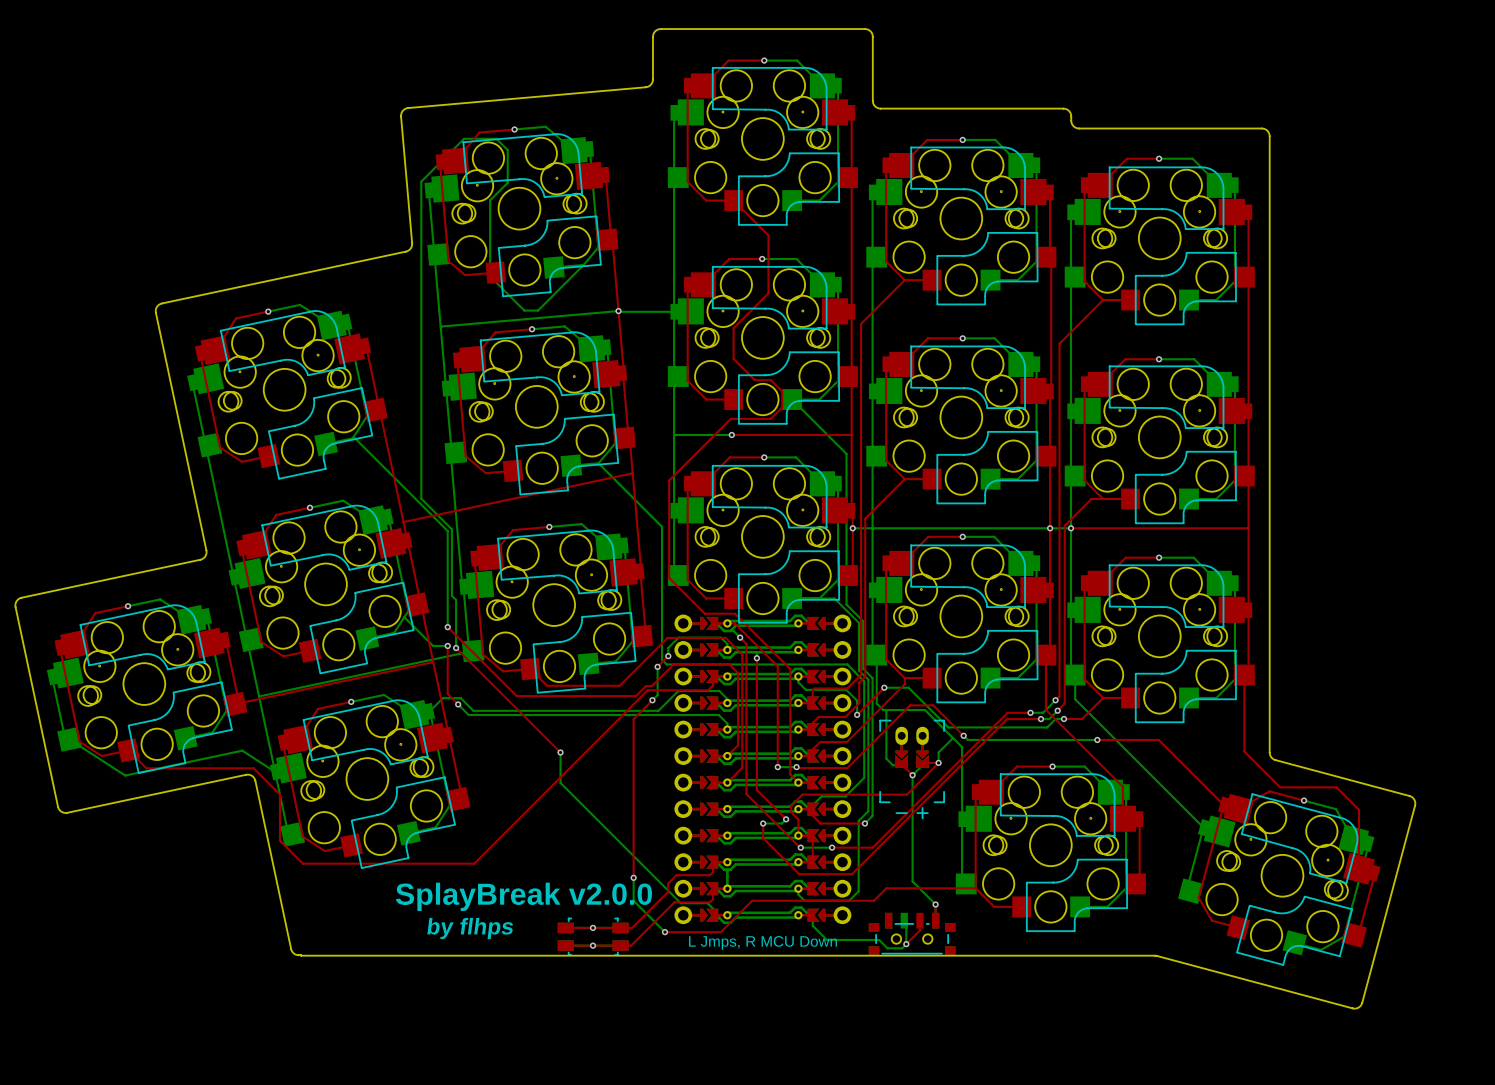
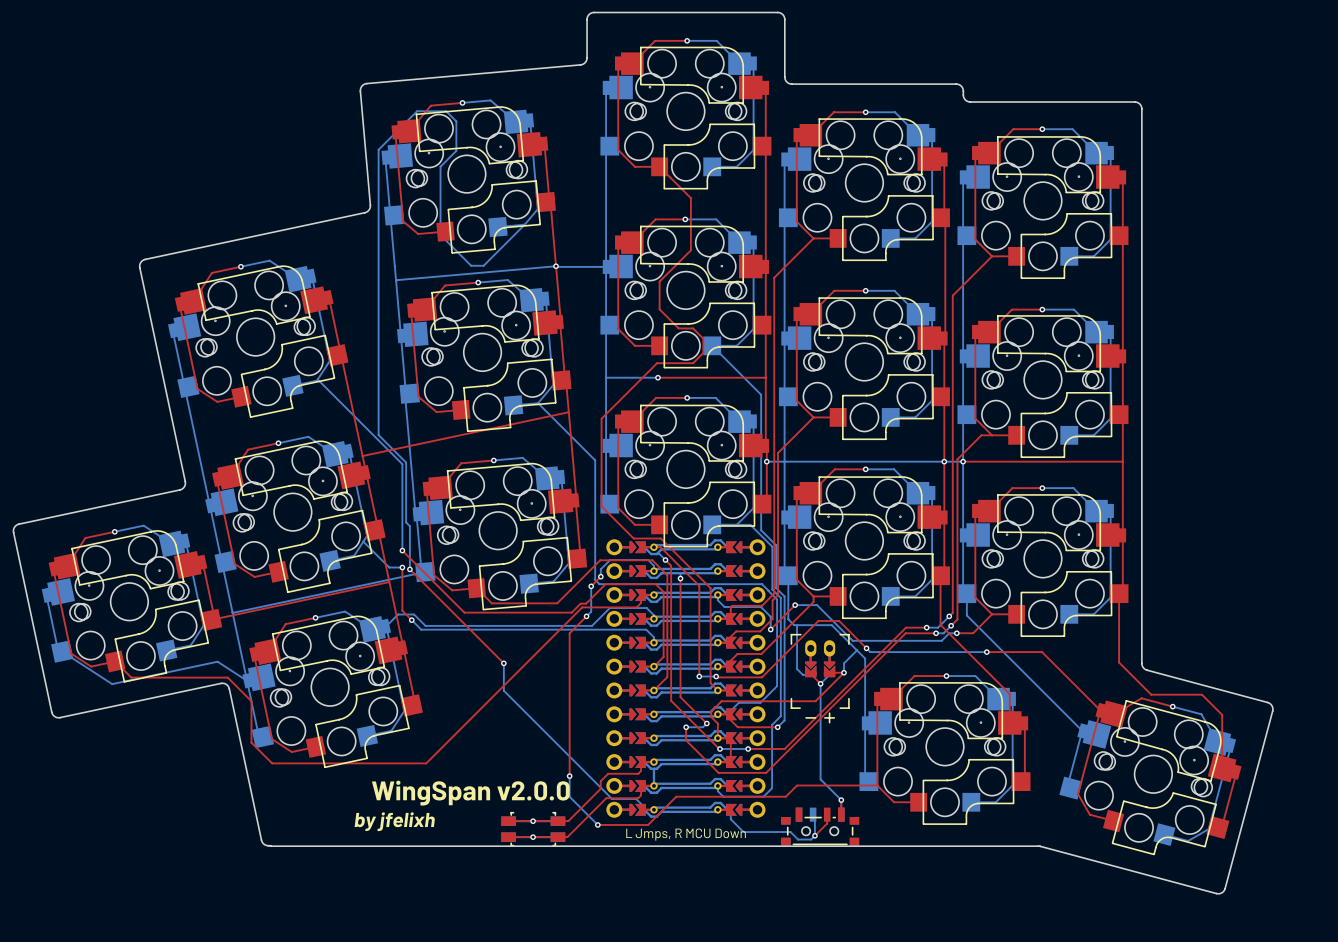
text: SplayBreak v2.0.0 (523, 896) -> WingSpan v2.0.0 (470, 793)
text: by flhps (470, 928) -> by jfelixh (394, 821)

